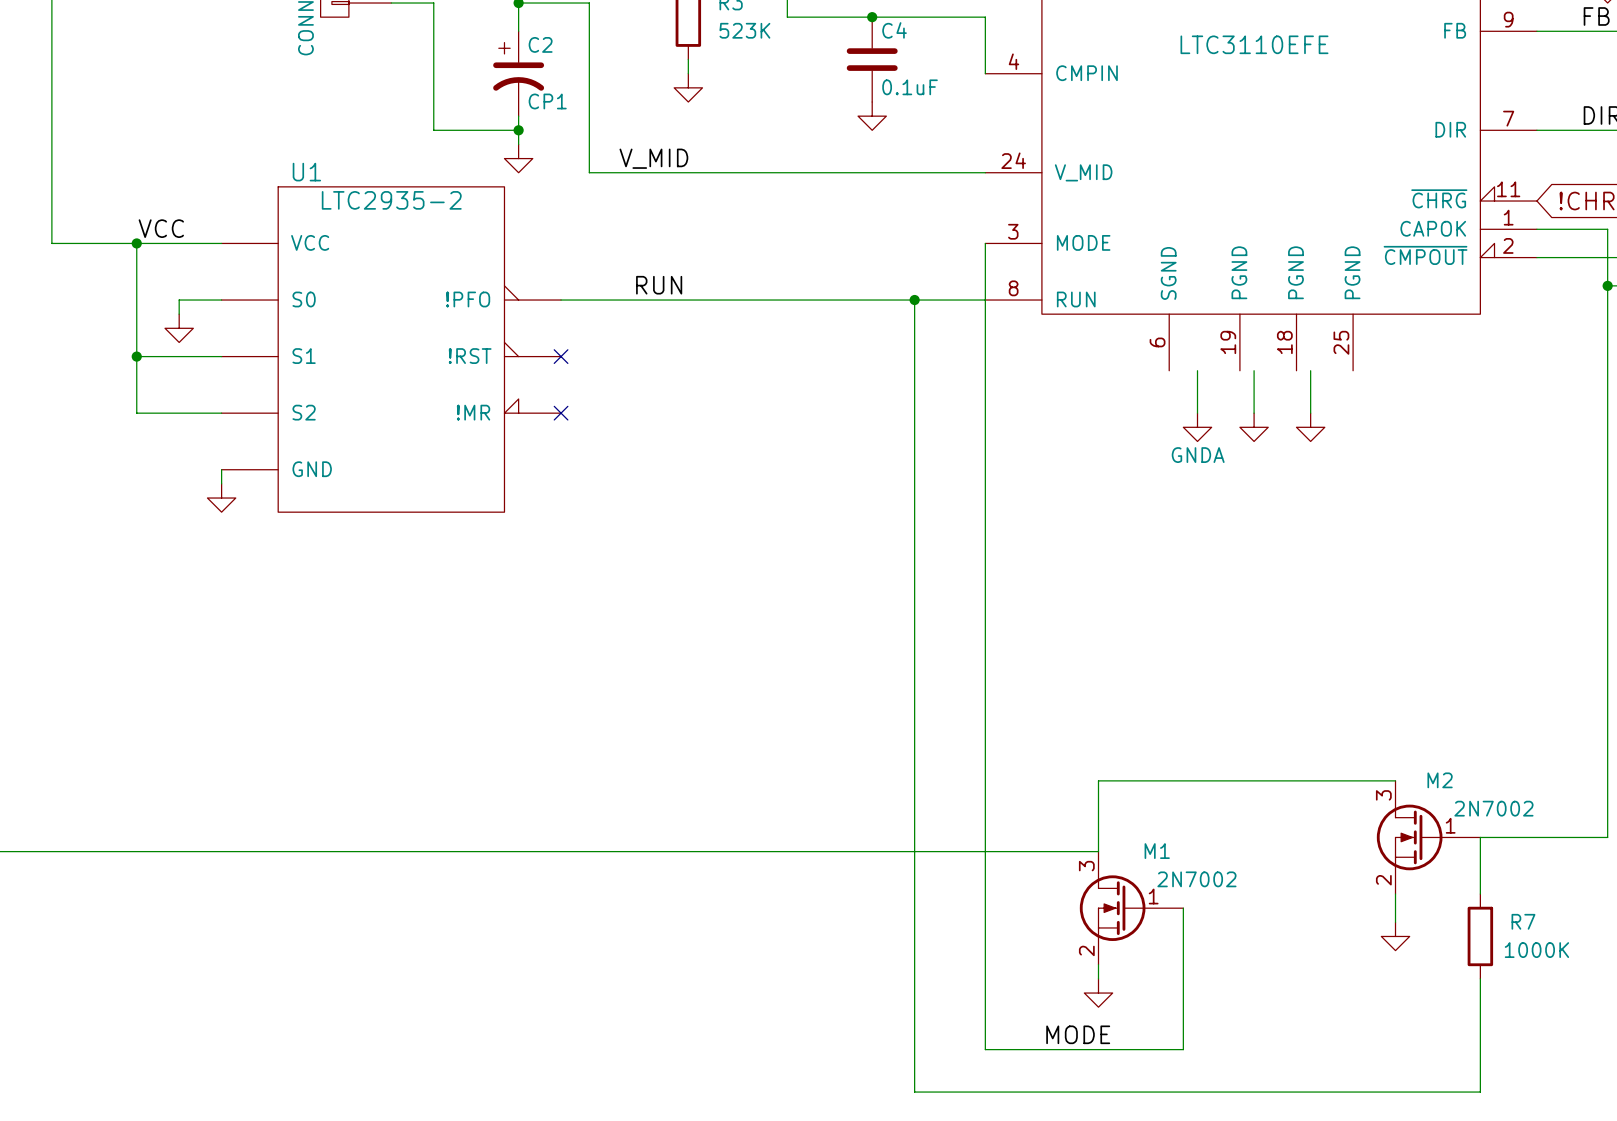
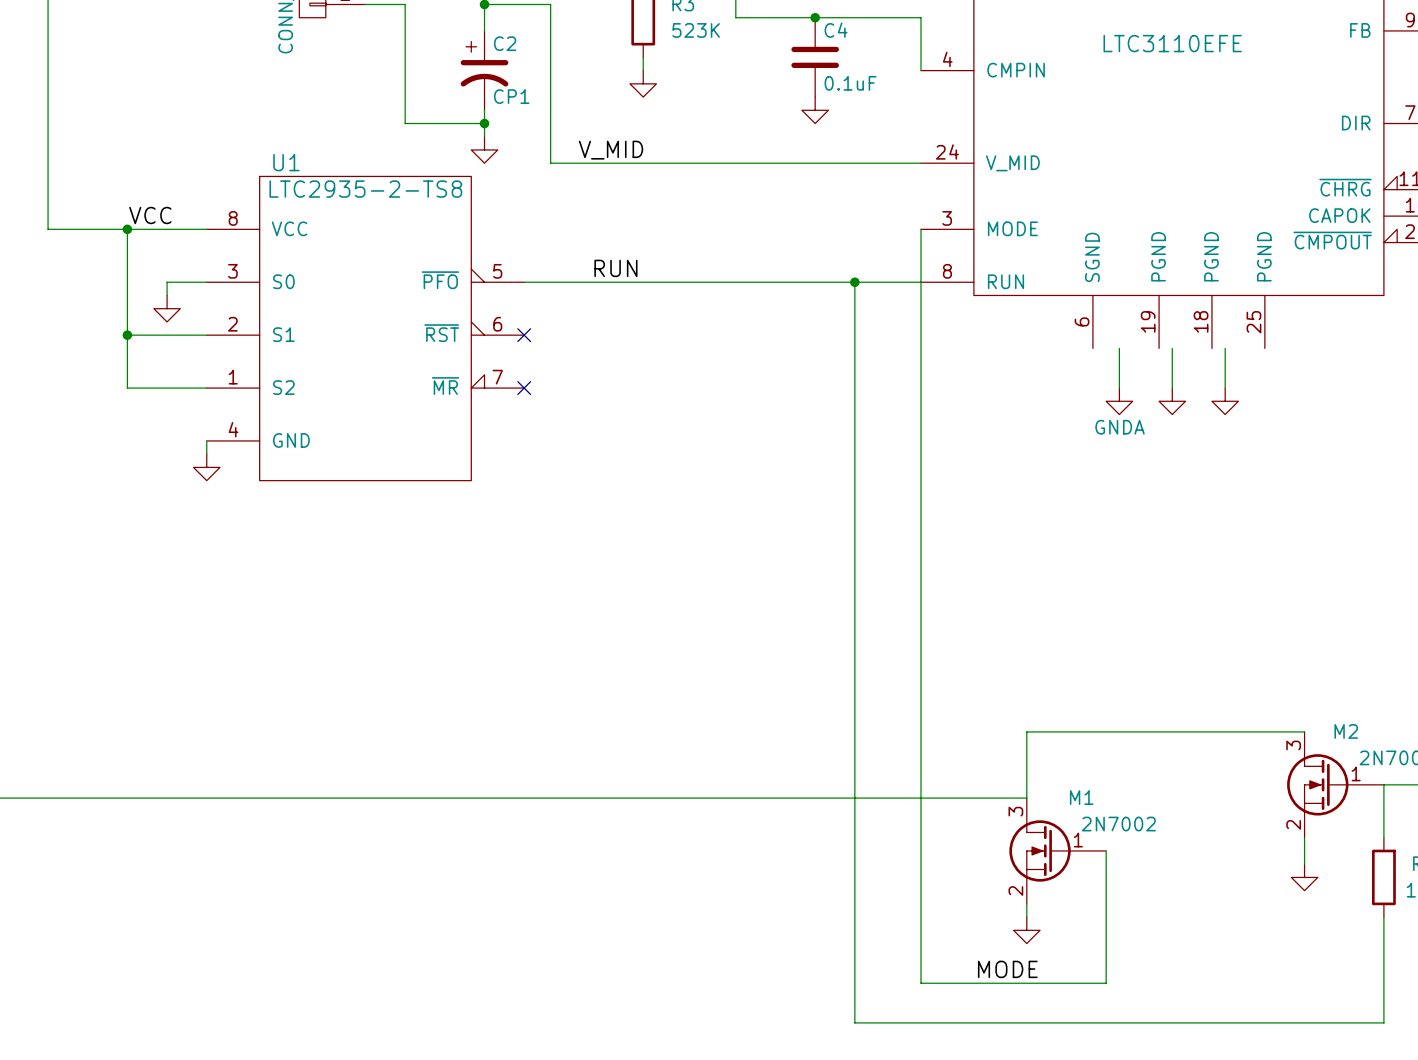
U1 symbol: [221, 186, 562, 513] -> [206, 176, 525, 481]
U1 value: LTC2935-2 (391, 200) -> LTC2935-2-TS8 (365, 189)

